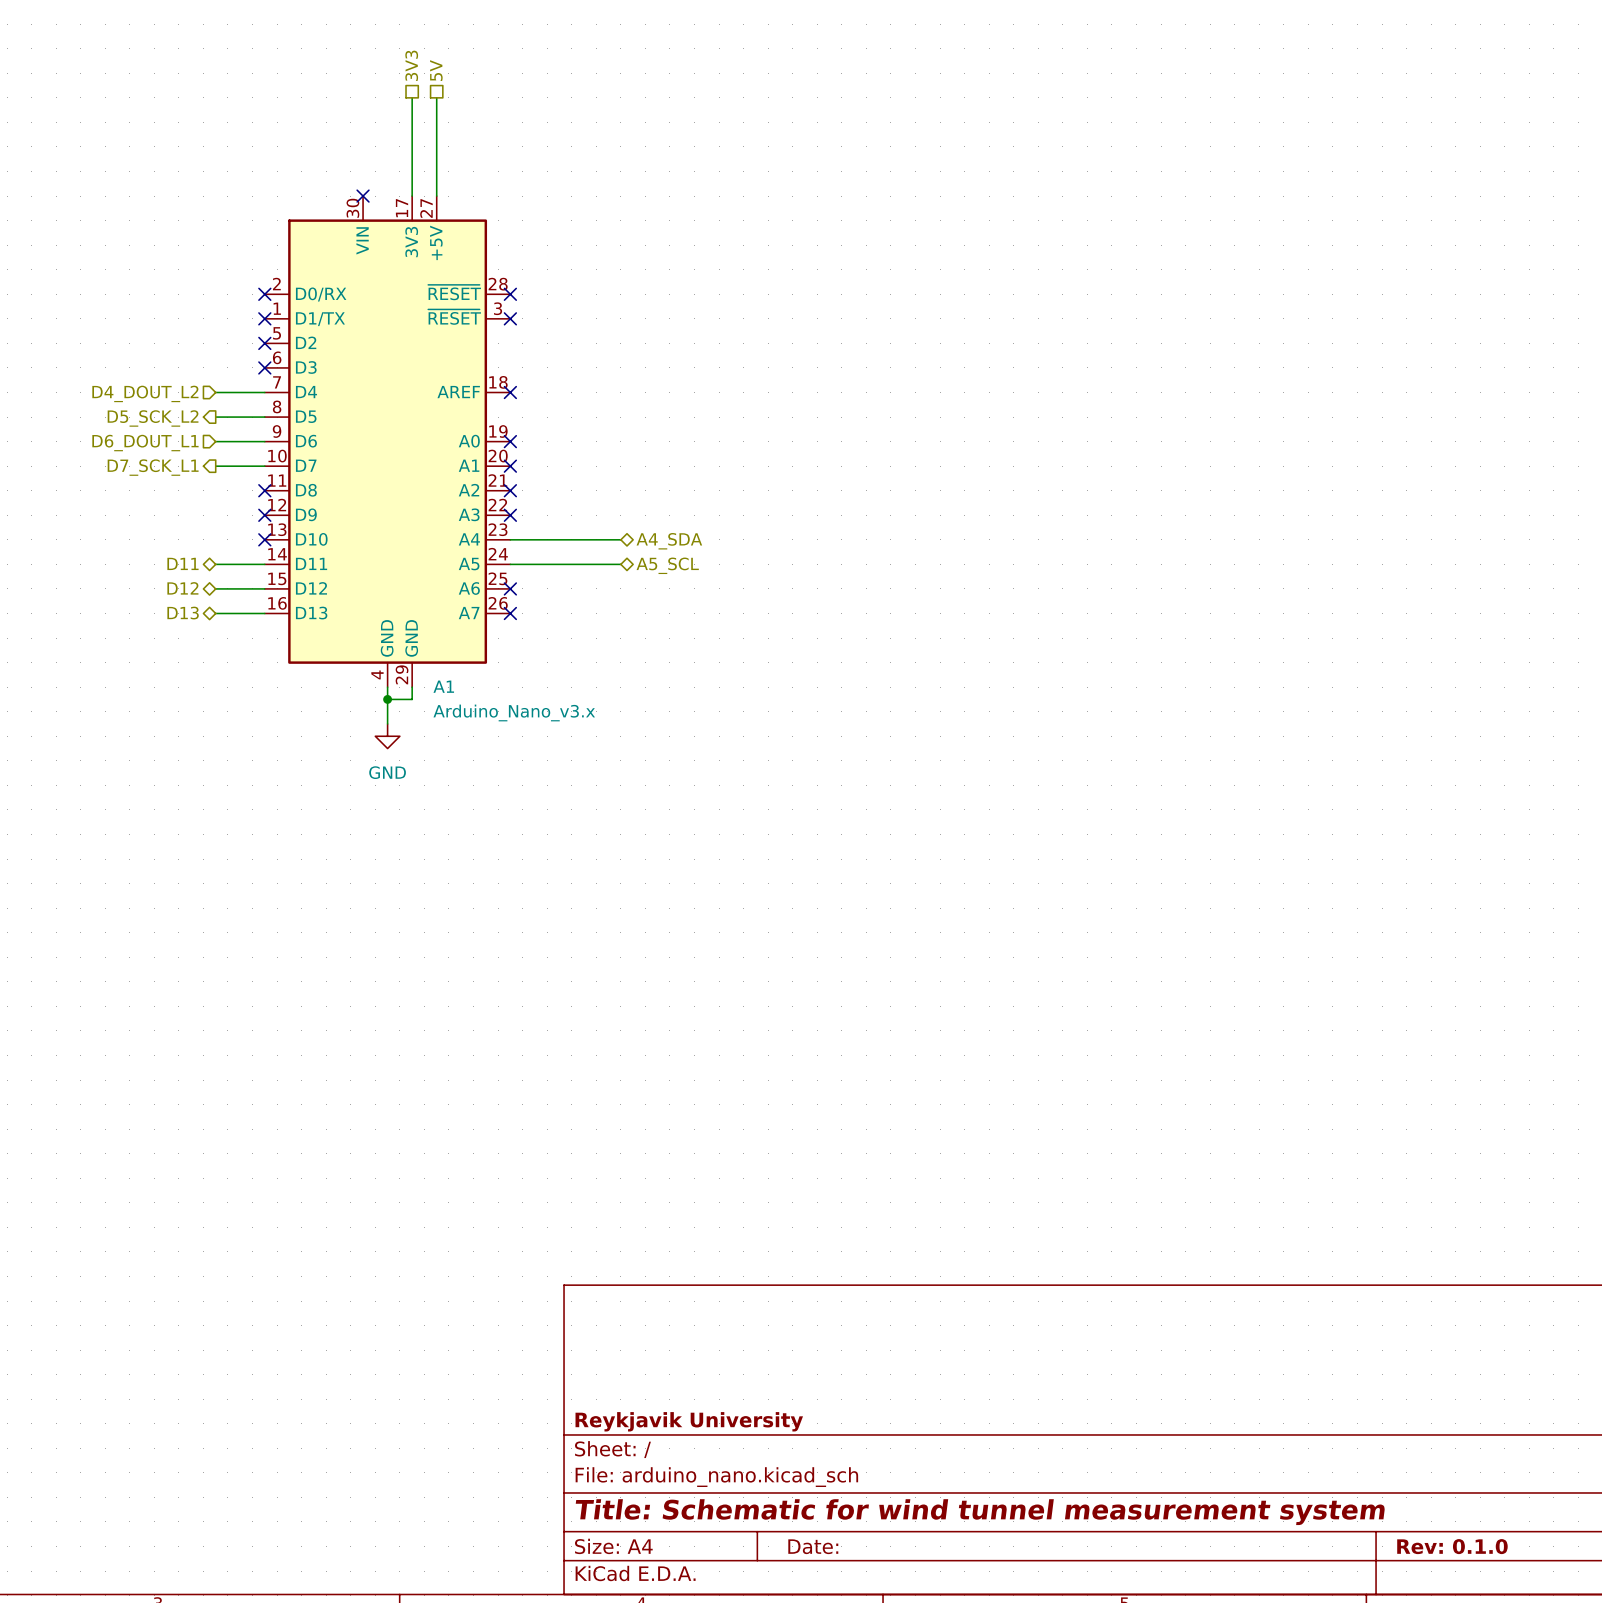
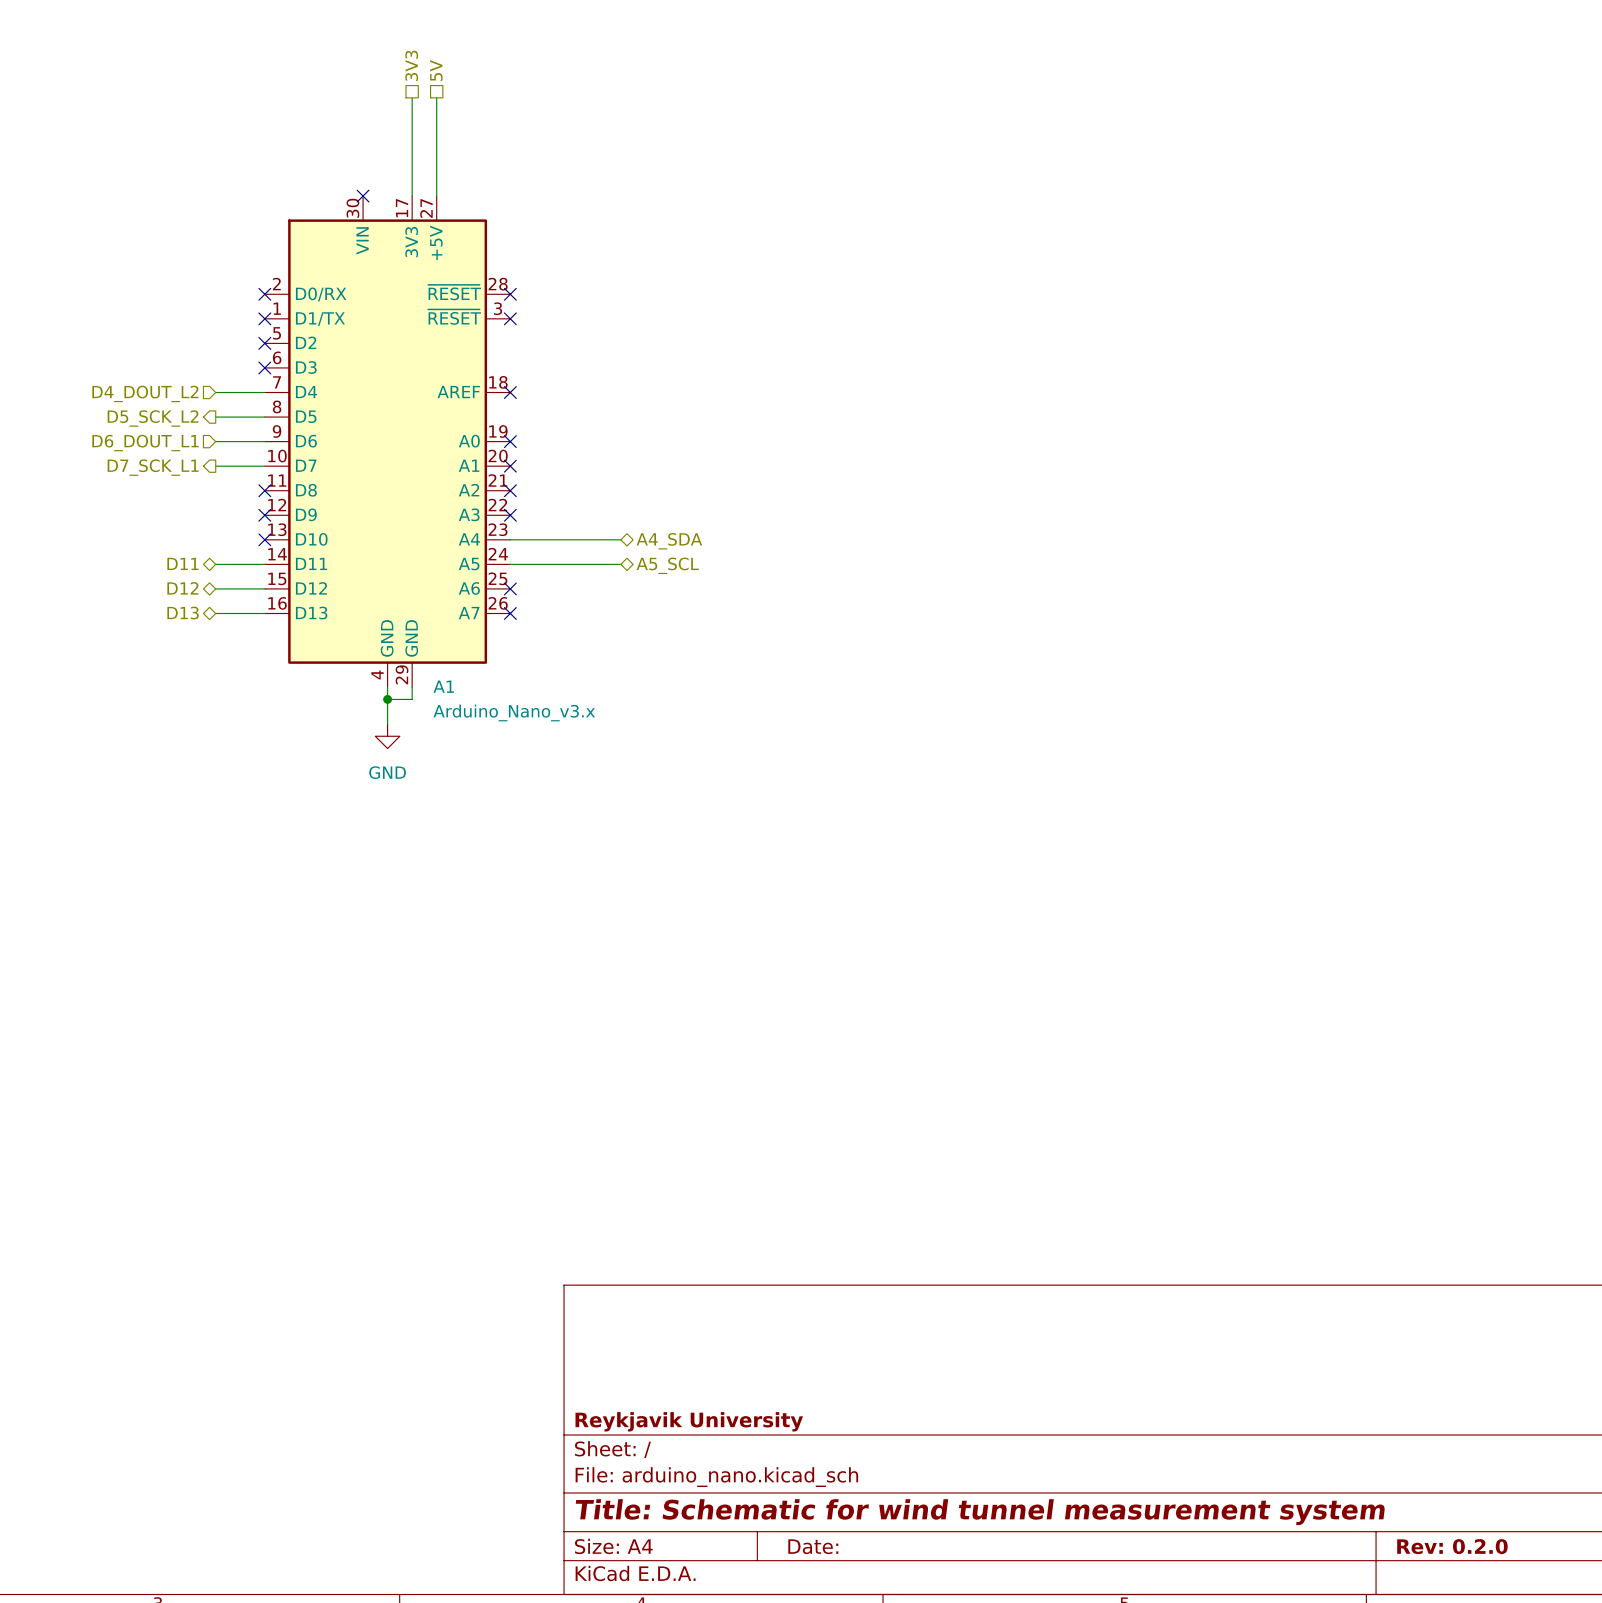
title block: Rev: 0.1.0 (1452, 1546) -> Rev: 0.2.0 (1452, 1546)

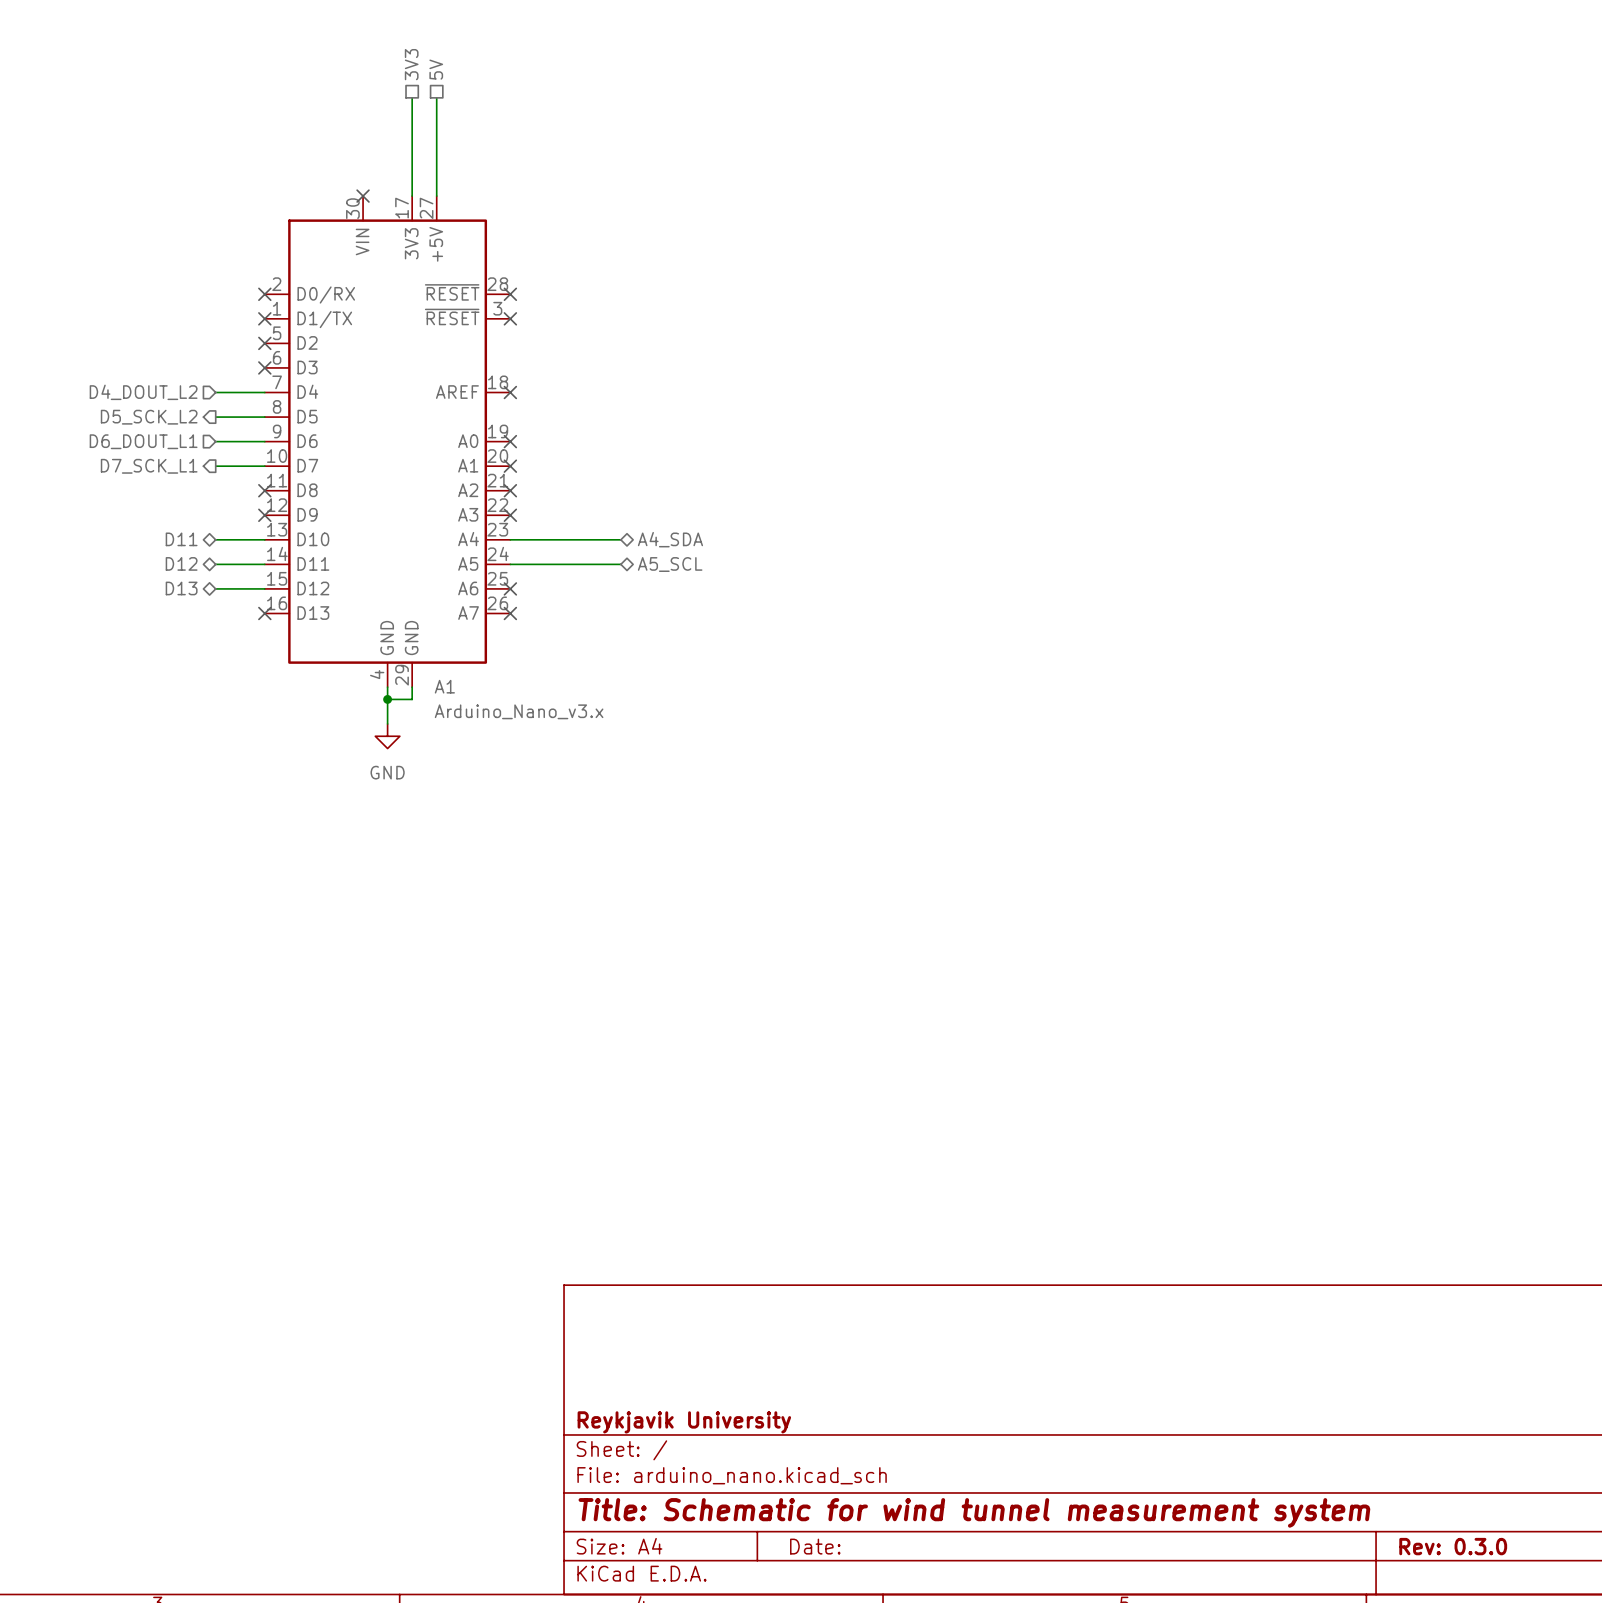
hierarchical label: none -> D11 (181, 539)
no-connect mark: (264, 539) -> none
hierarchical label: D11 (182, 563) -> D12 (181, 563)
hierarchical label: D12 (182, 588) -> D13 (181, 588)
hierarchical label: D13 (183, 613) -> none
wire: (215, 613) (264, 613) -> (215, 539) (264, 539)
no-connect mark: none -> (264, 613)
title block: Rev: 0.2.0 (1452, 1546) -> Rev: 0.3.0 (1453, 1546)

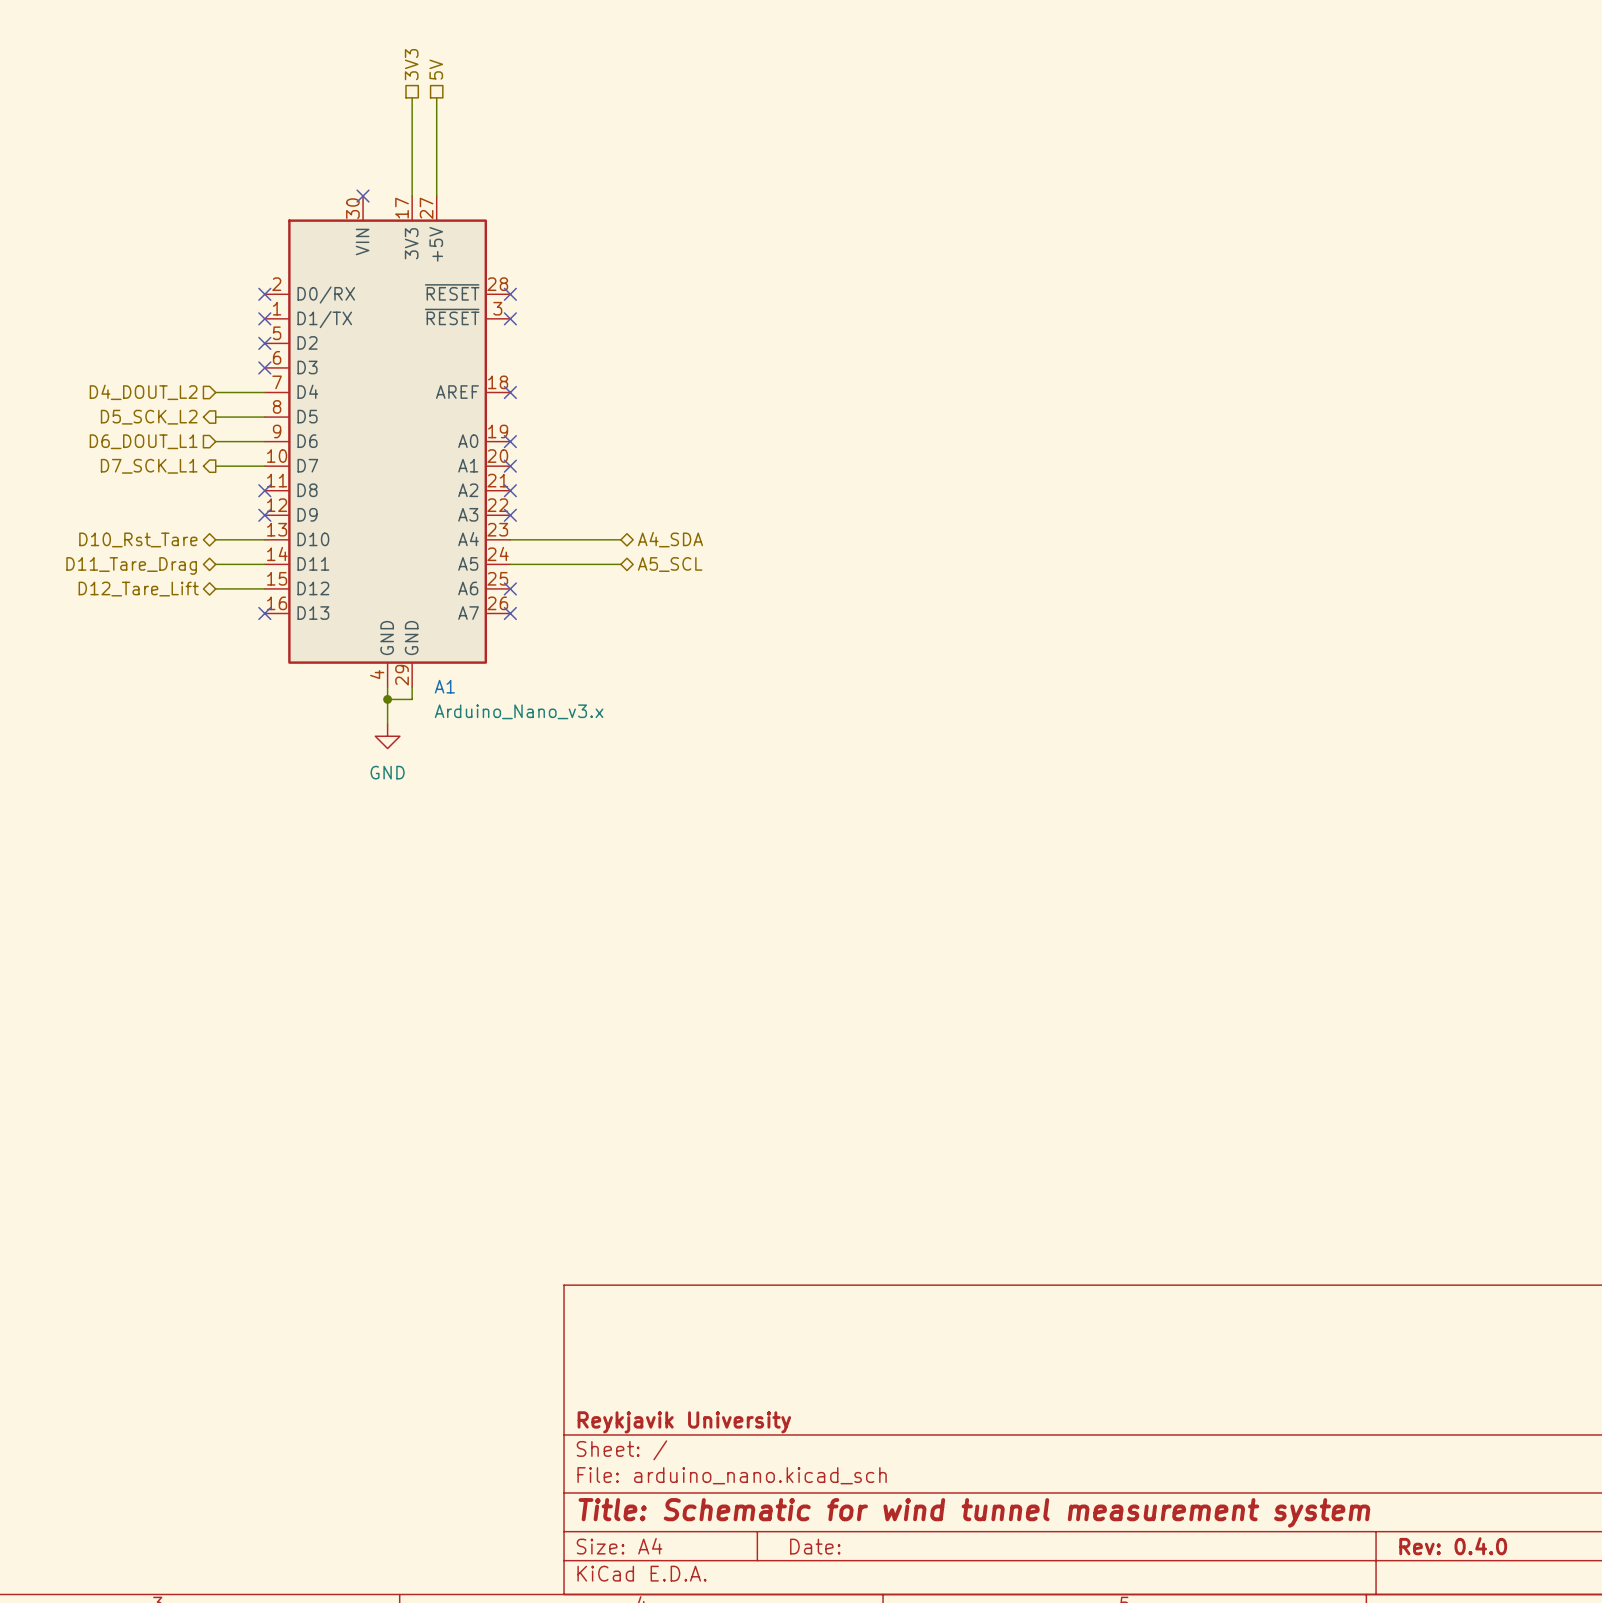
hierarchical label: D11 (181, 539) -> D10_Rst_Tare (138, 539)
hierarchical label: D12 (181, 563) -> D11_Tare_Drag (131, 565)
hierarchical label: D13 (181, 588) -> D12_Tare_Lift (138, 589)
title block: Rev: 0.3.0 (1453, 1546) -> Rev: 0.4.0 (1453, 1546)

